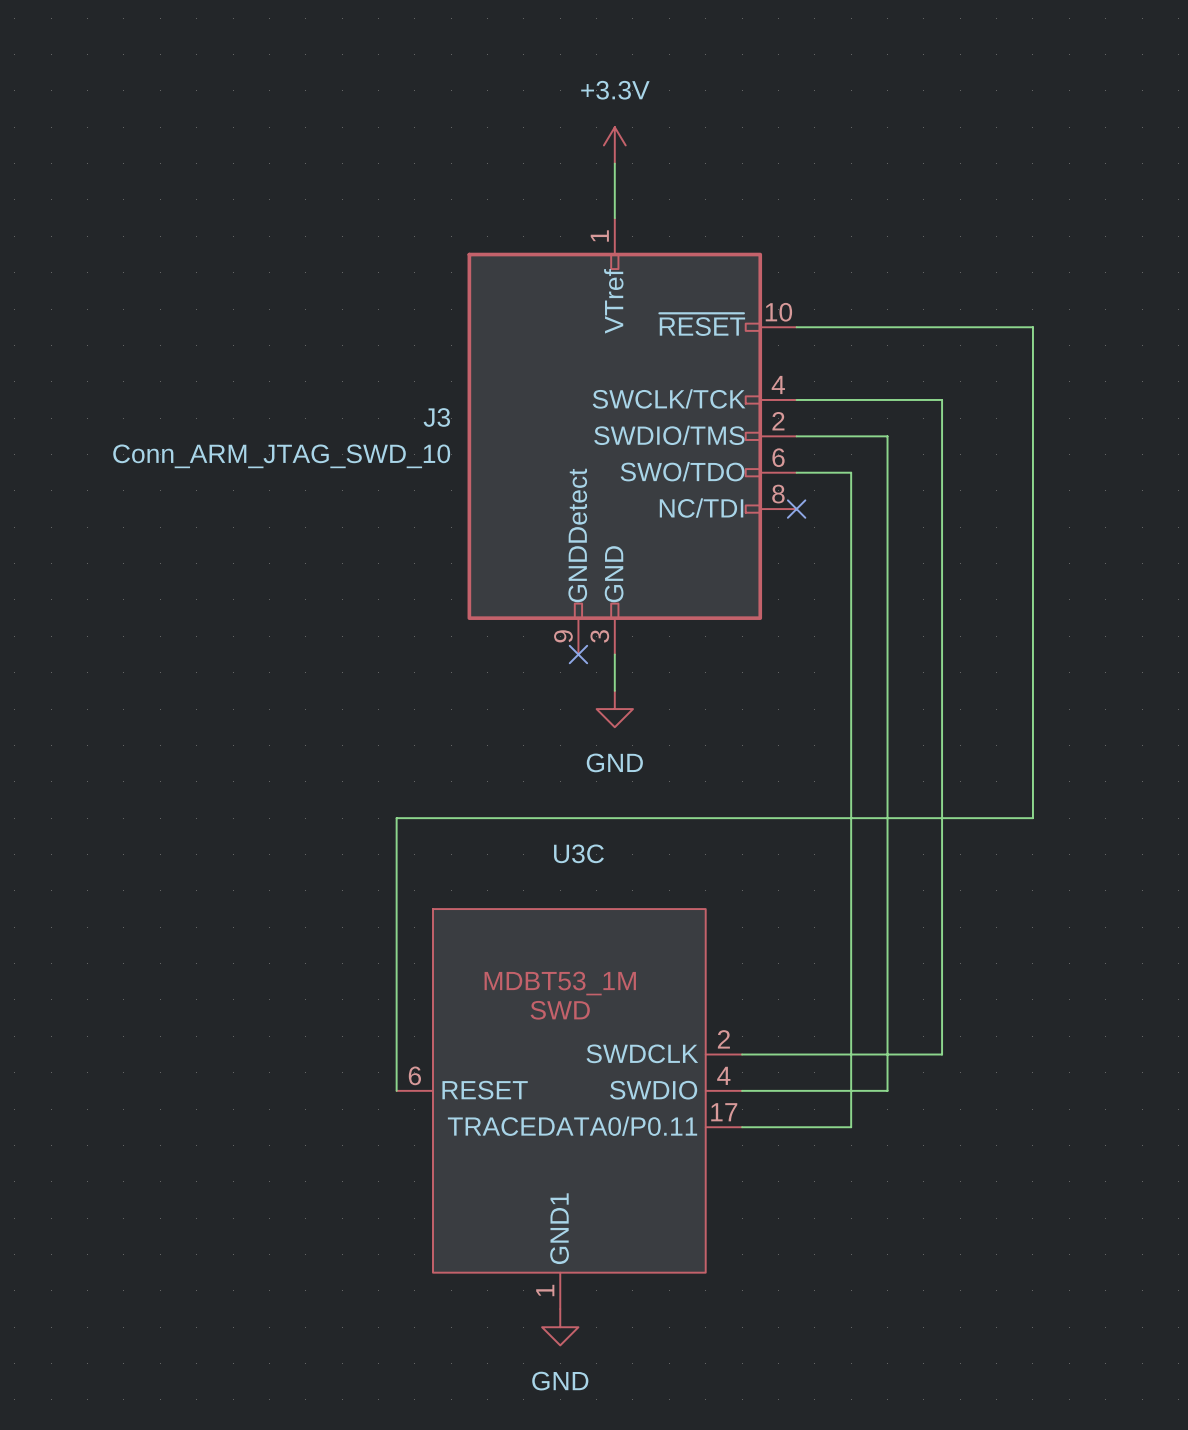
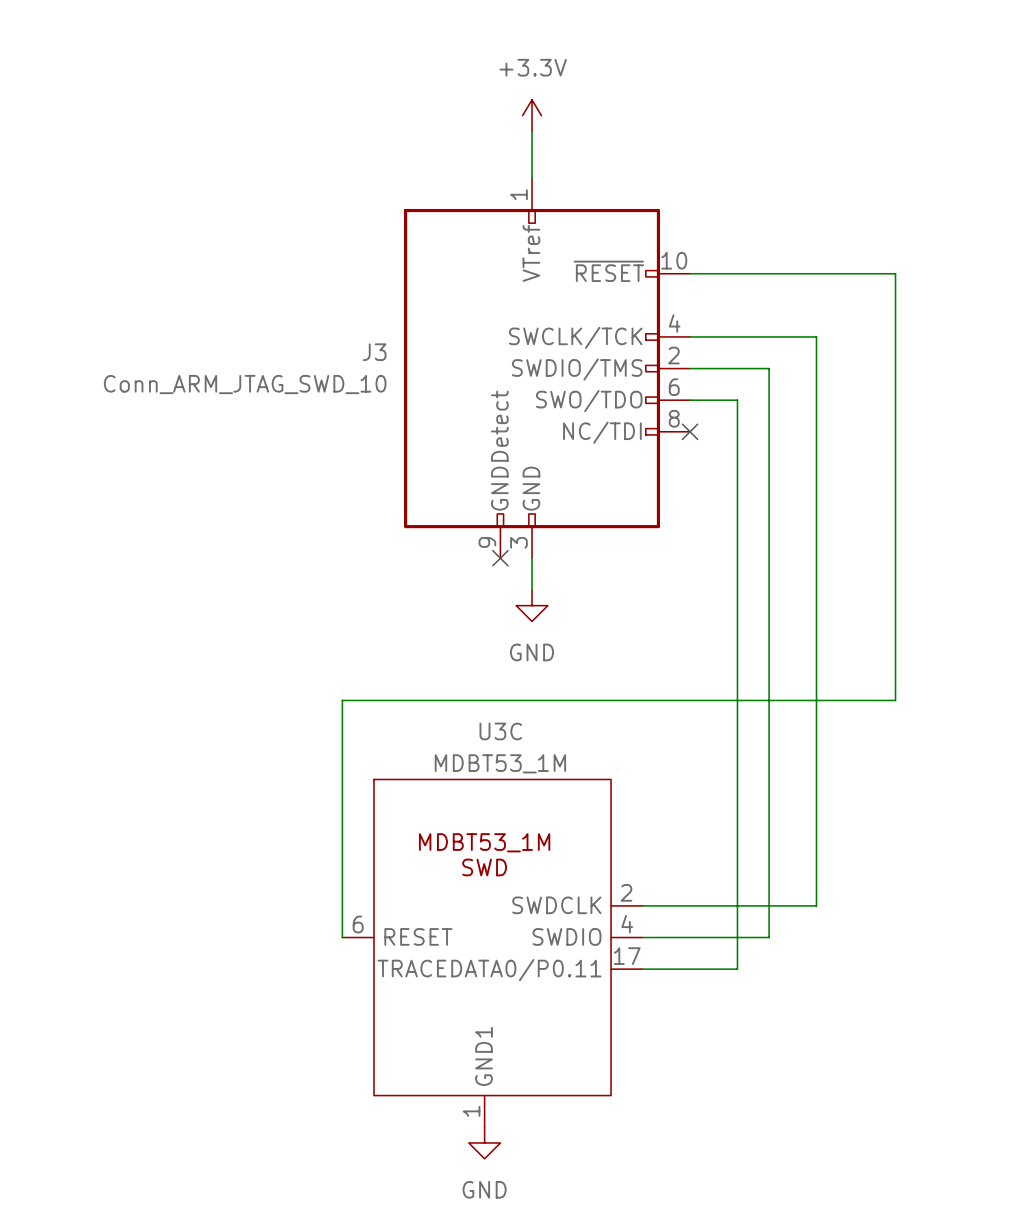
U3C value: none -> MDBT53_1M (500, 763)

